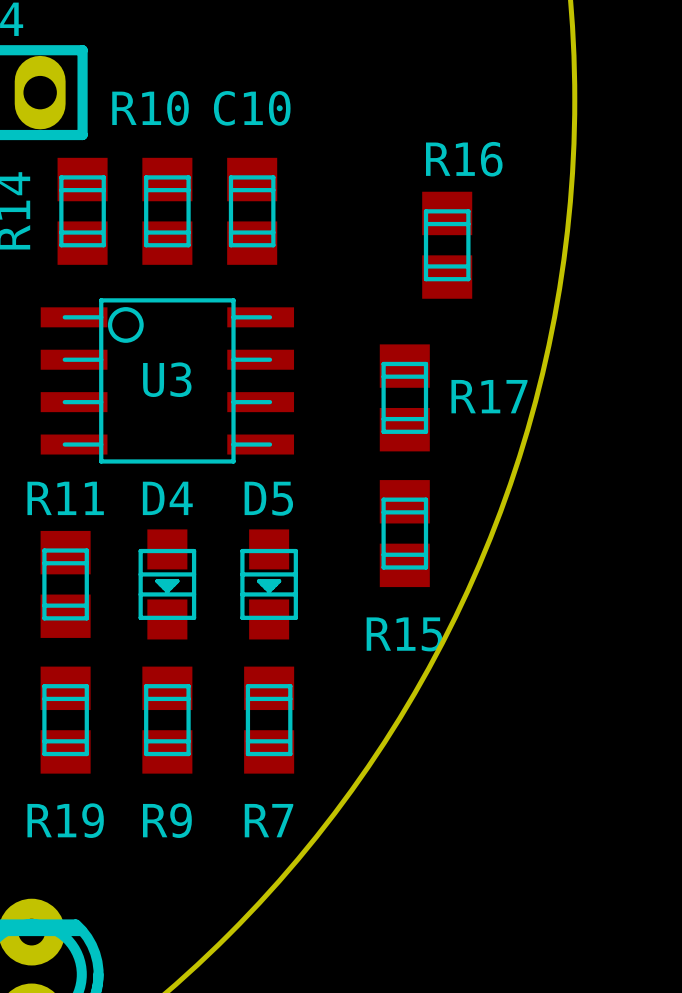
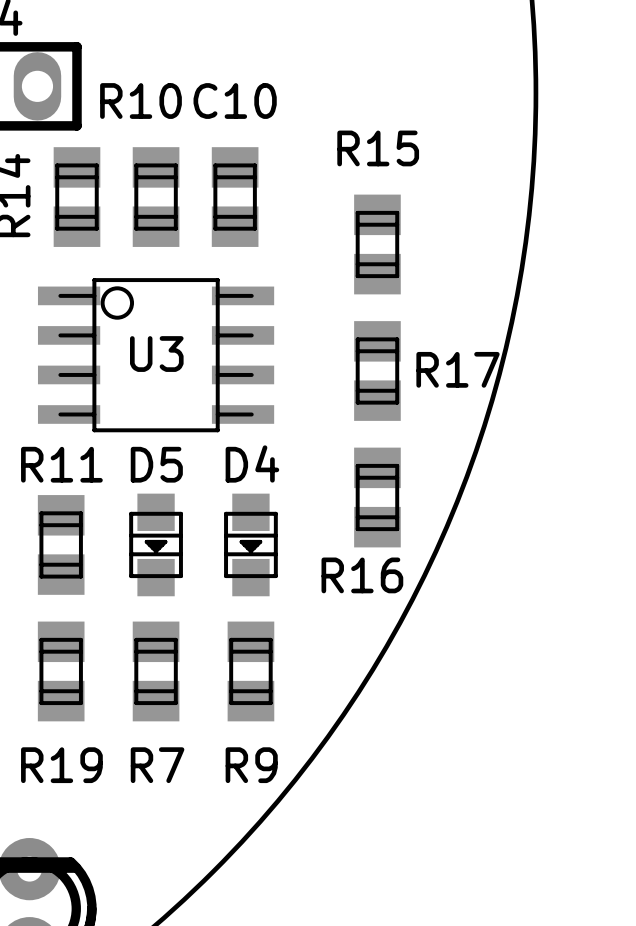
R16 rotation: 0° (447, 245) -> 180° (377, 497)
R16 position: (447, 245) -> (377, 497)
D4 name: D4 (167, 498) -> D5 (156, 464)
D5 name: D5 (268, 498) -> D4 (252, 463)
R15 rotation: 0° (404, 533) -> 180° (377, 244)
R15 position: (404, 533) -> (377, 244)
R9 position: (167, 720) -> (250, 671)
R7 position: (269, 720) -> (156, 671)

